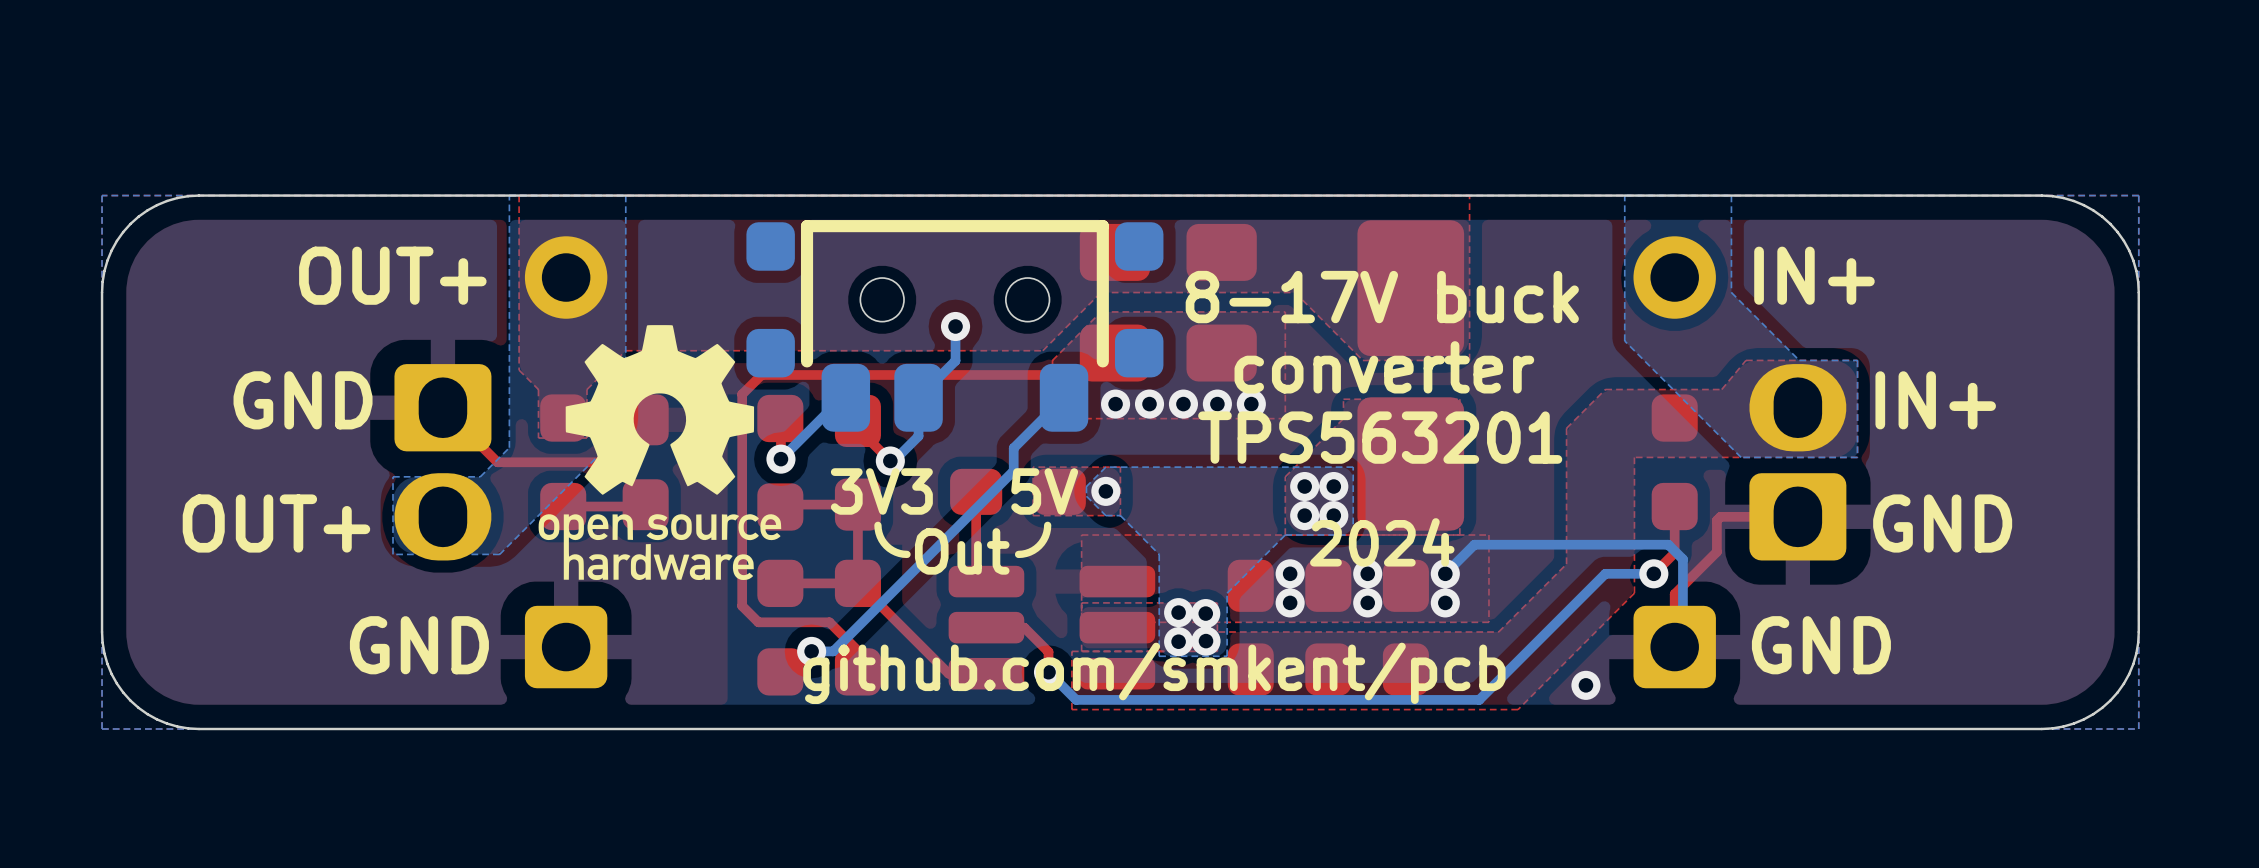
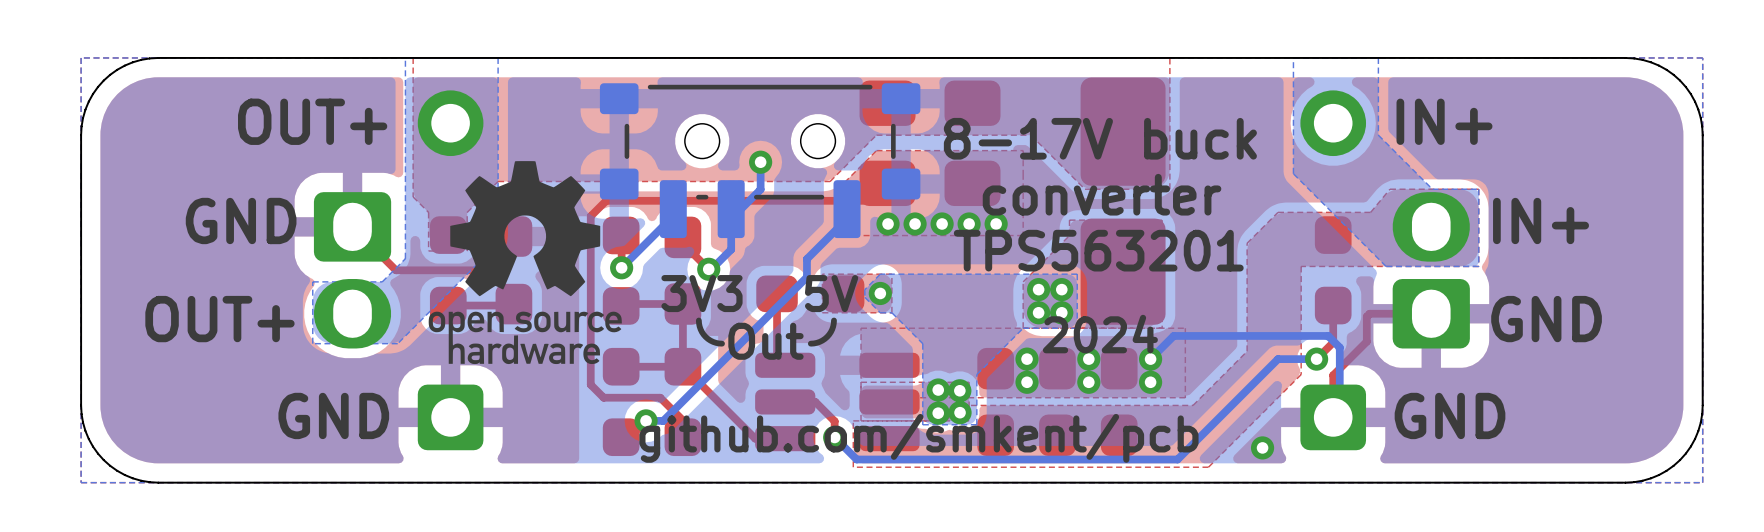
part footprint: [746, 220, 1164, 432] -> [599, 83, 921, 239]

